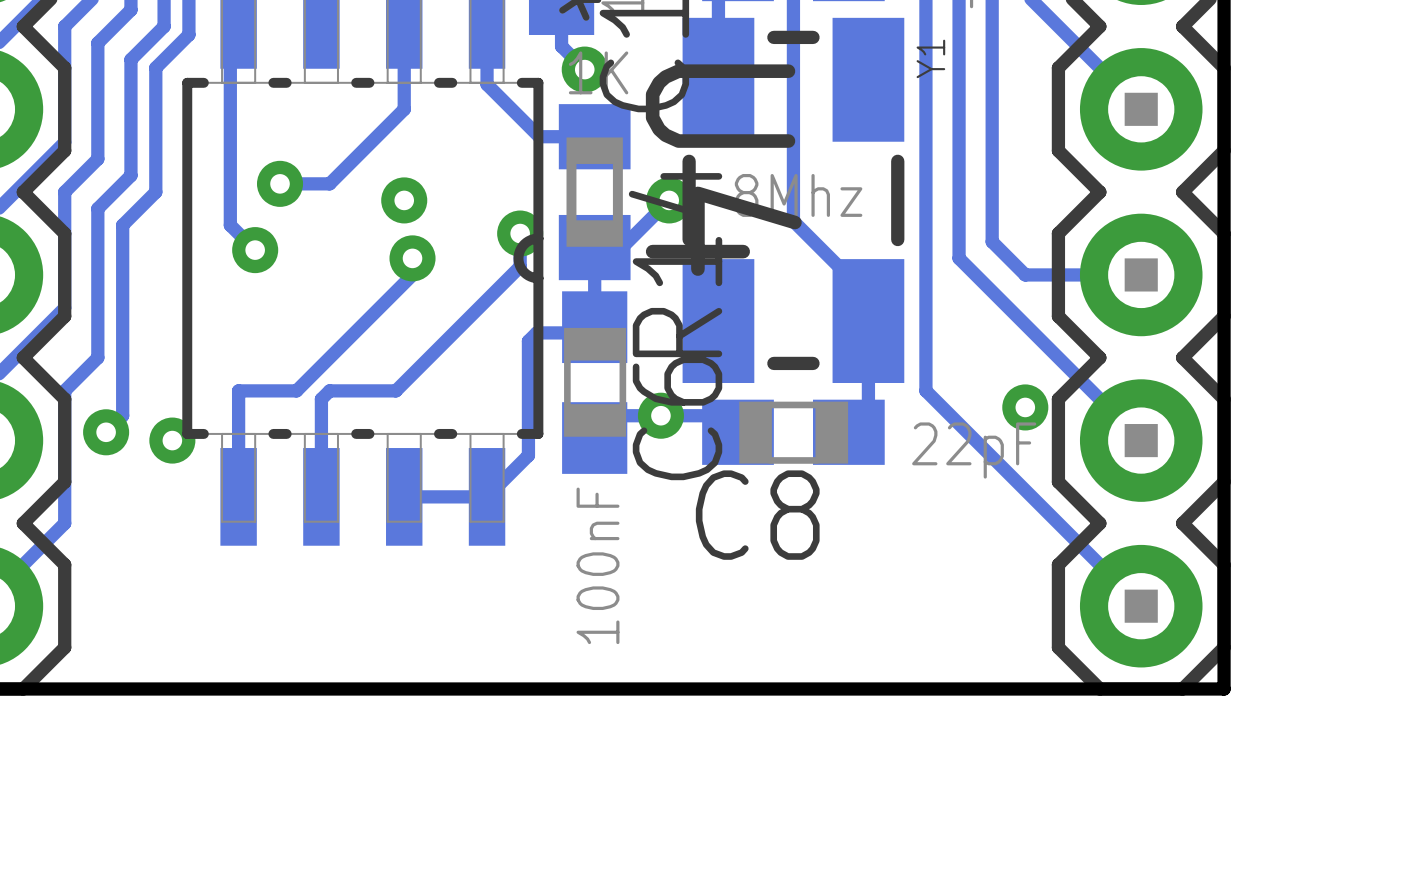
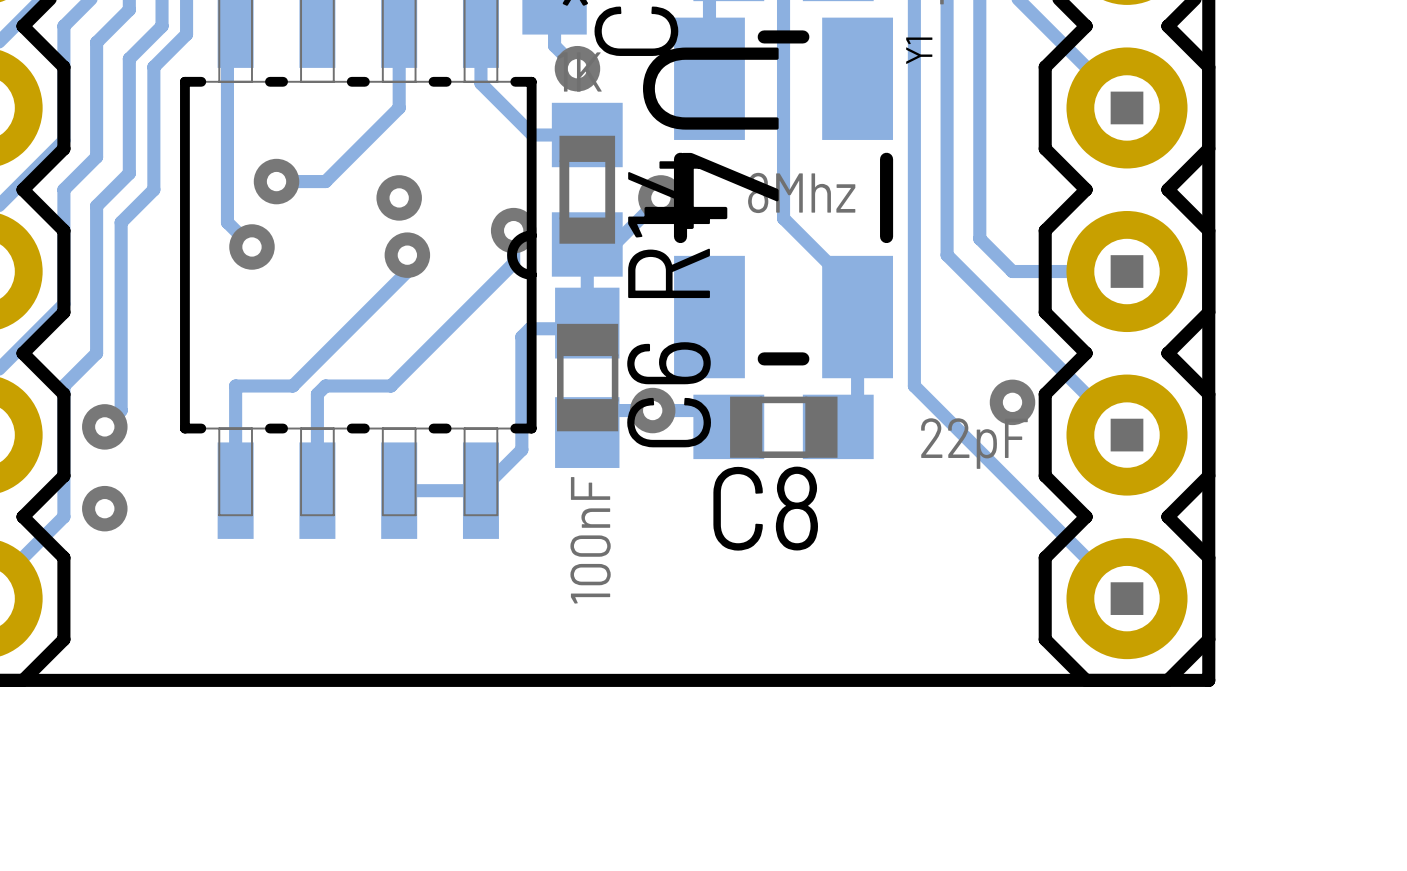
via position: (172, 440) -> (104, 508)

